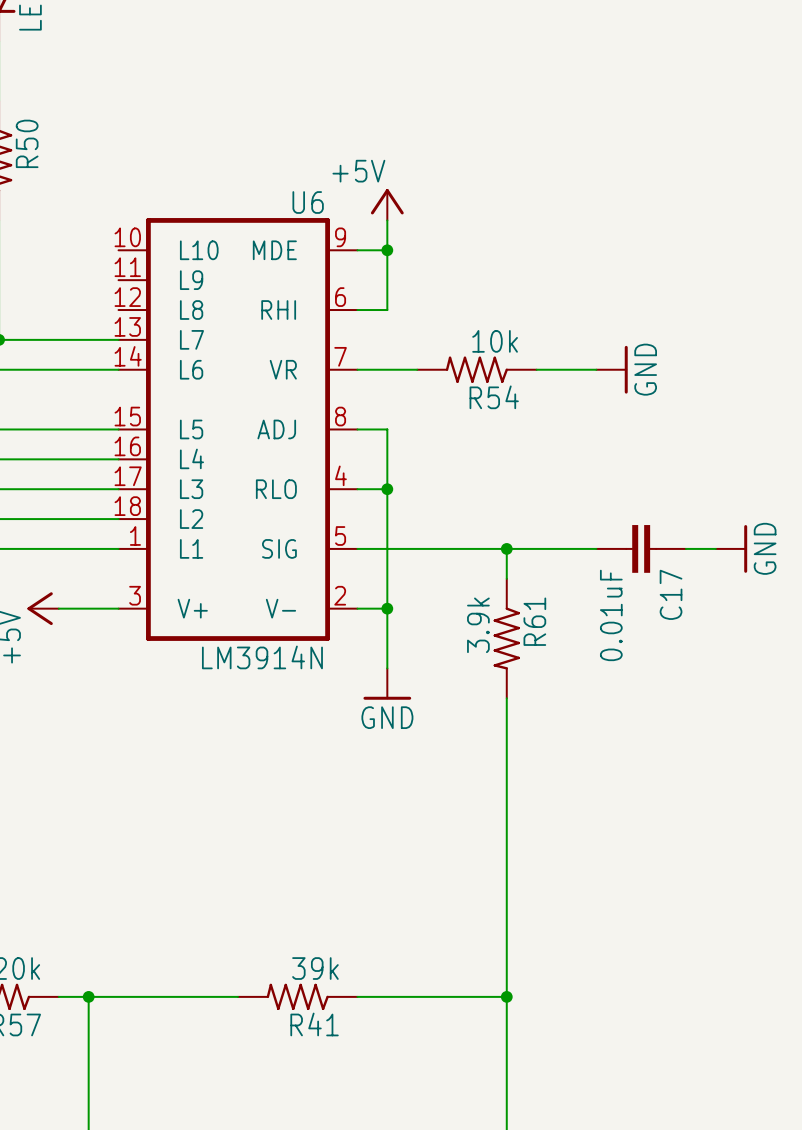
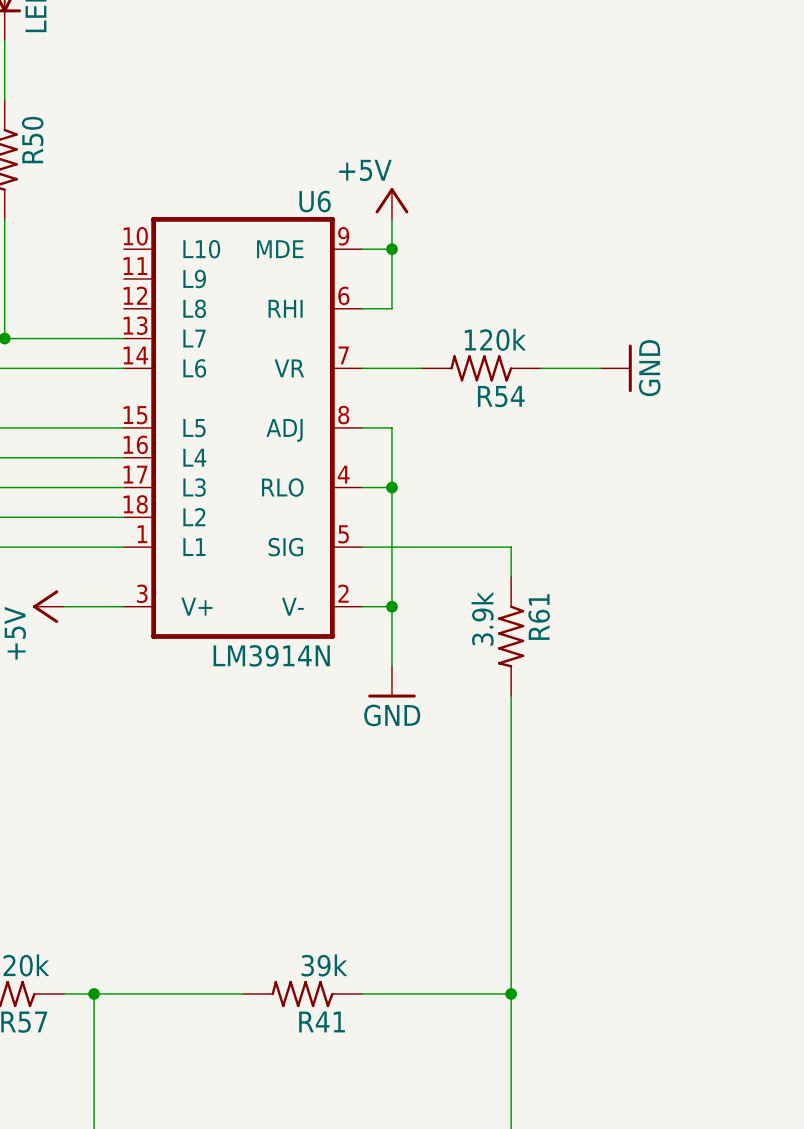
R54 value: 10k (495, 341) -> 120k (495, 339)
wire: (506, 548) (596, 548) -> none
junction: (506, 548) -> none
C17: 0.01uF (641, 548) -> none
wire: (685, 548) (715, 548) -> none
power symbol: GND (731, 548) -> none

